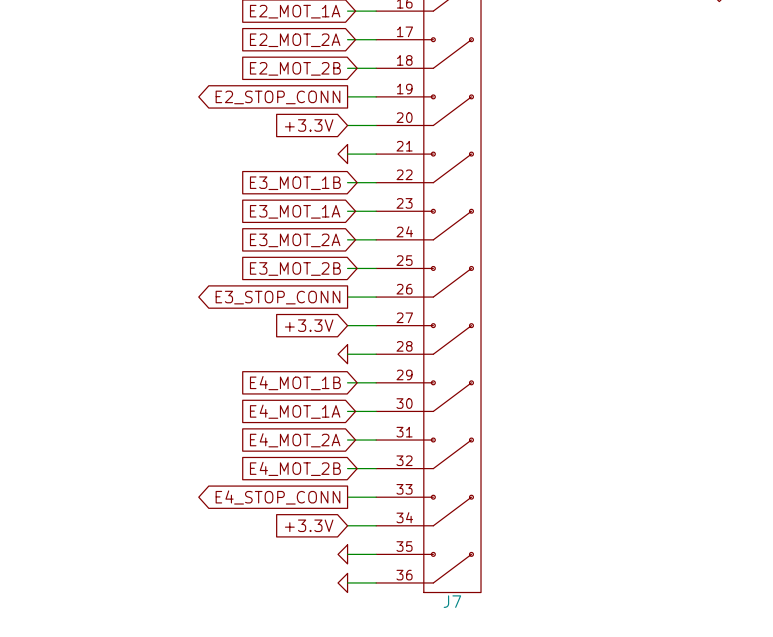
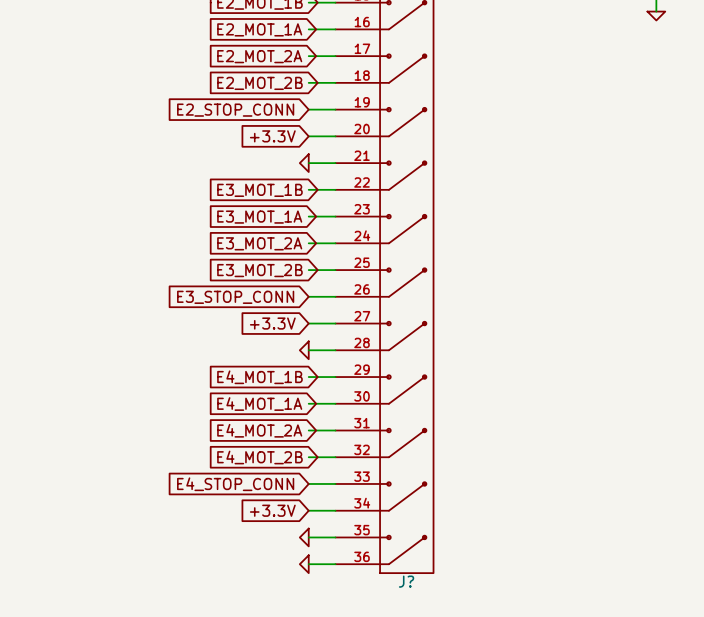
global label shape: output (277, 97) -> input (235, 110)
global label shape: output (277, 297) -> input (235, 297)
global label shape: output (277, 497) -> input (235, 484)
J7 name: J7 (452, 601) -> J? (406, 581)

